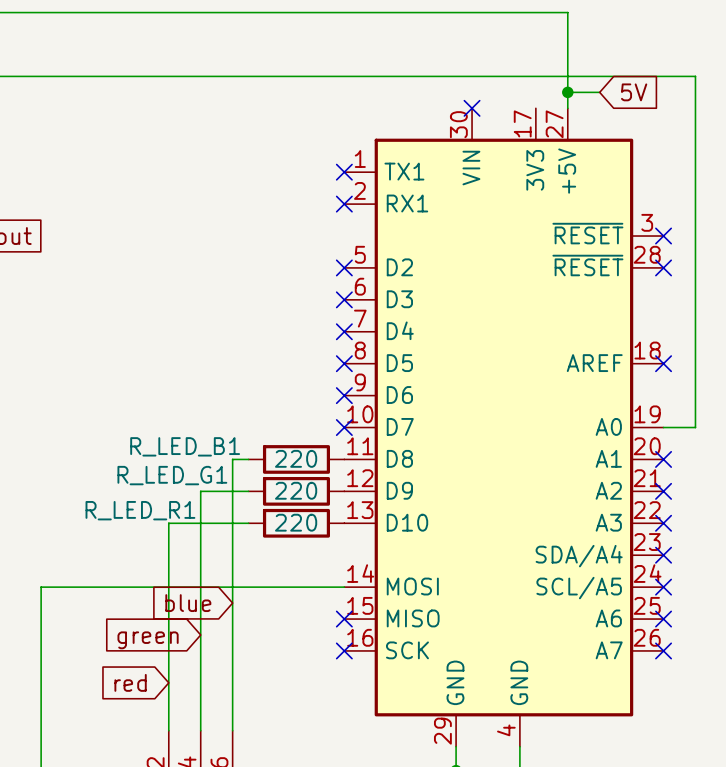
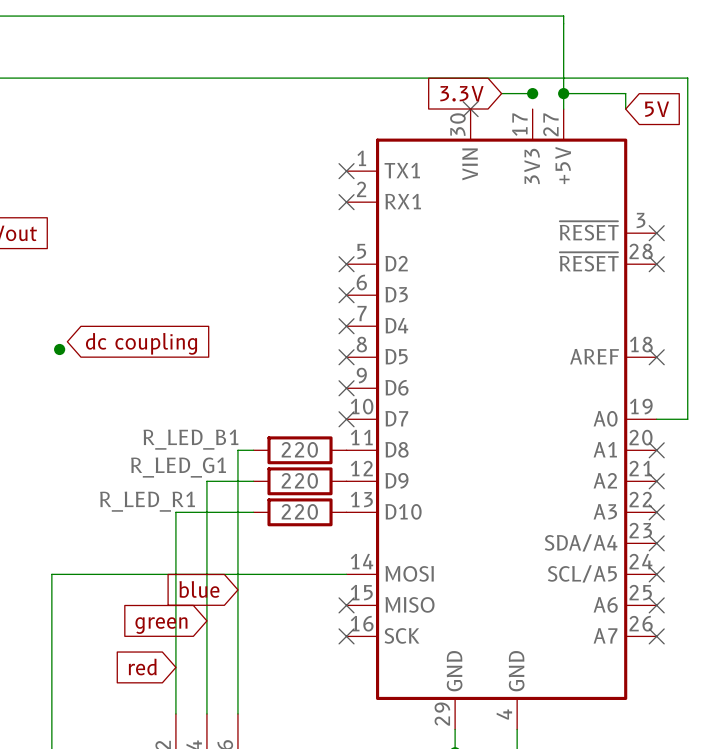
global label: none -> 3.3V (461, 93)
wire: none -> (501, 93) (532, 93)
junction: none -> (532, 93)
wire: none -> (594, 93) (625, 93) (625, 109)
global label position: 5V (634, 92) -> 5V (657, 109)
global label: none -> dc coupling (141, 343)
junction: none -> (59, 349)

